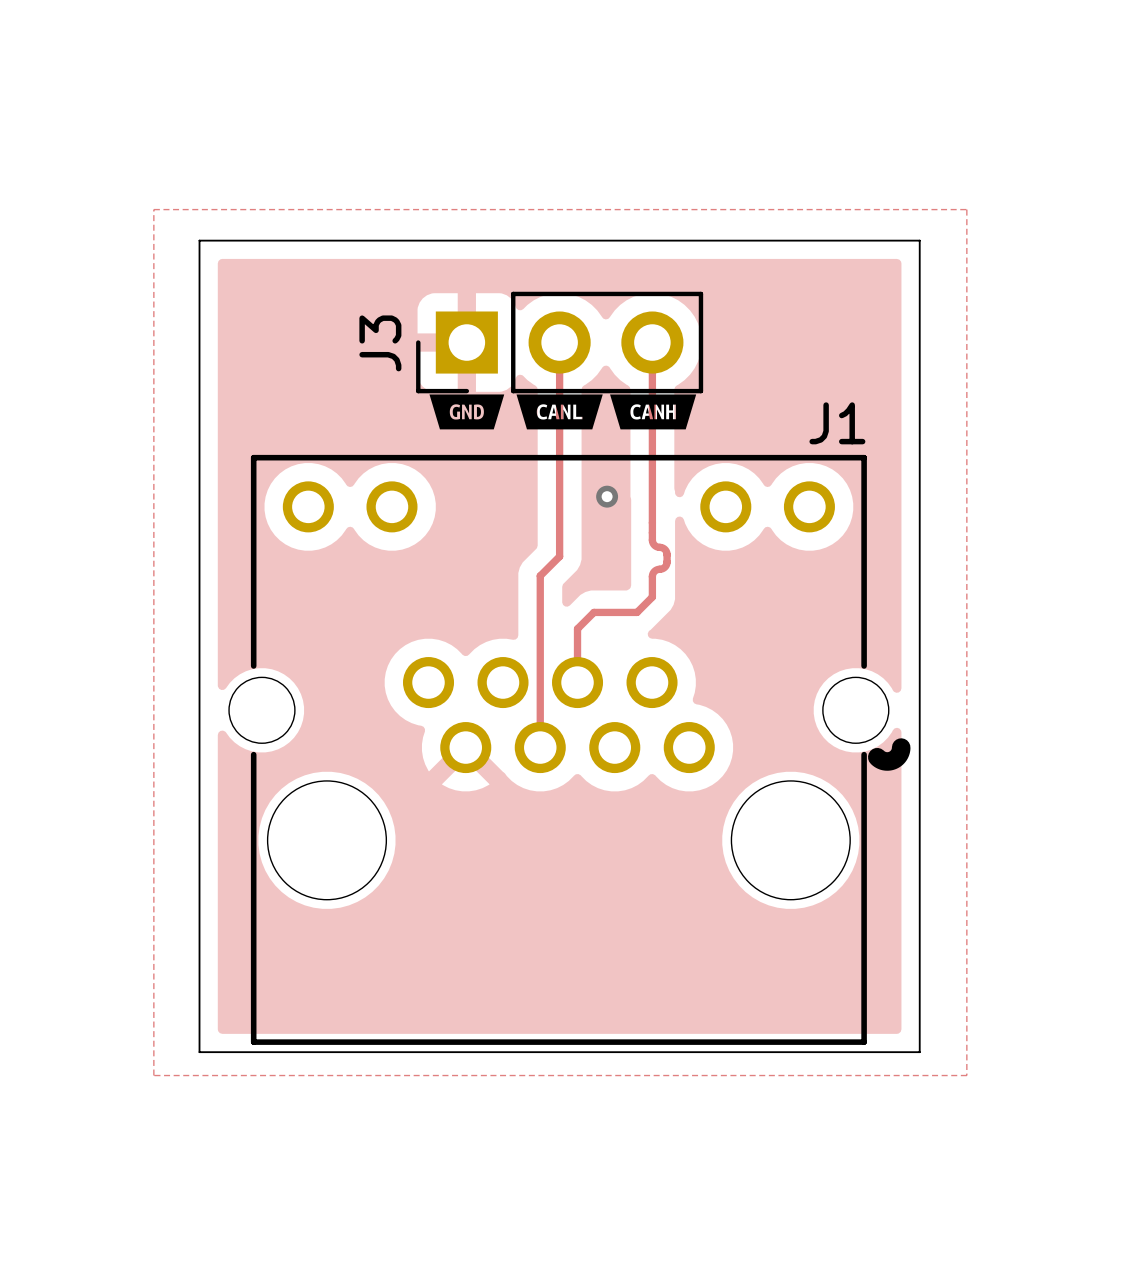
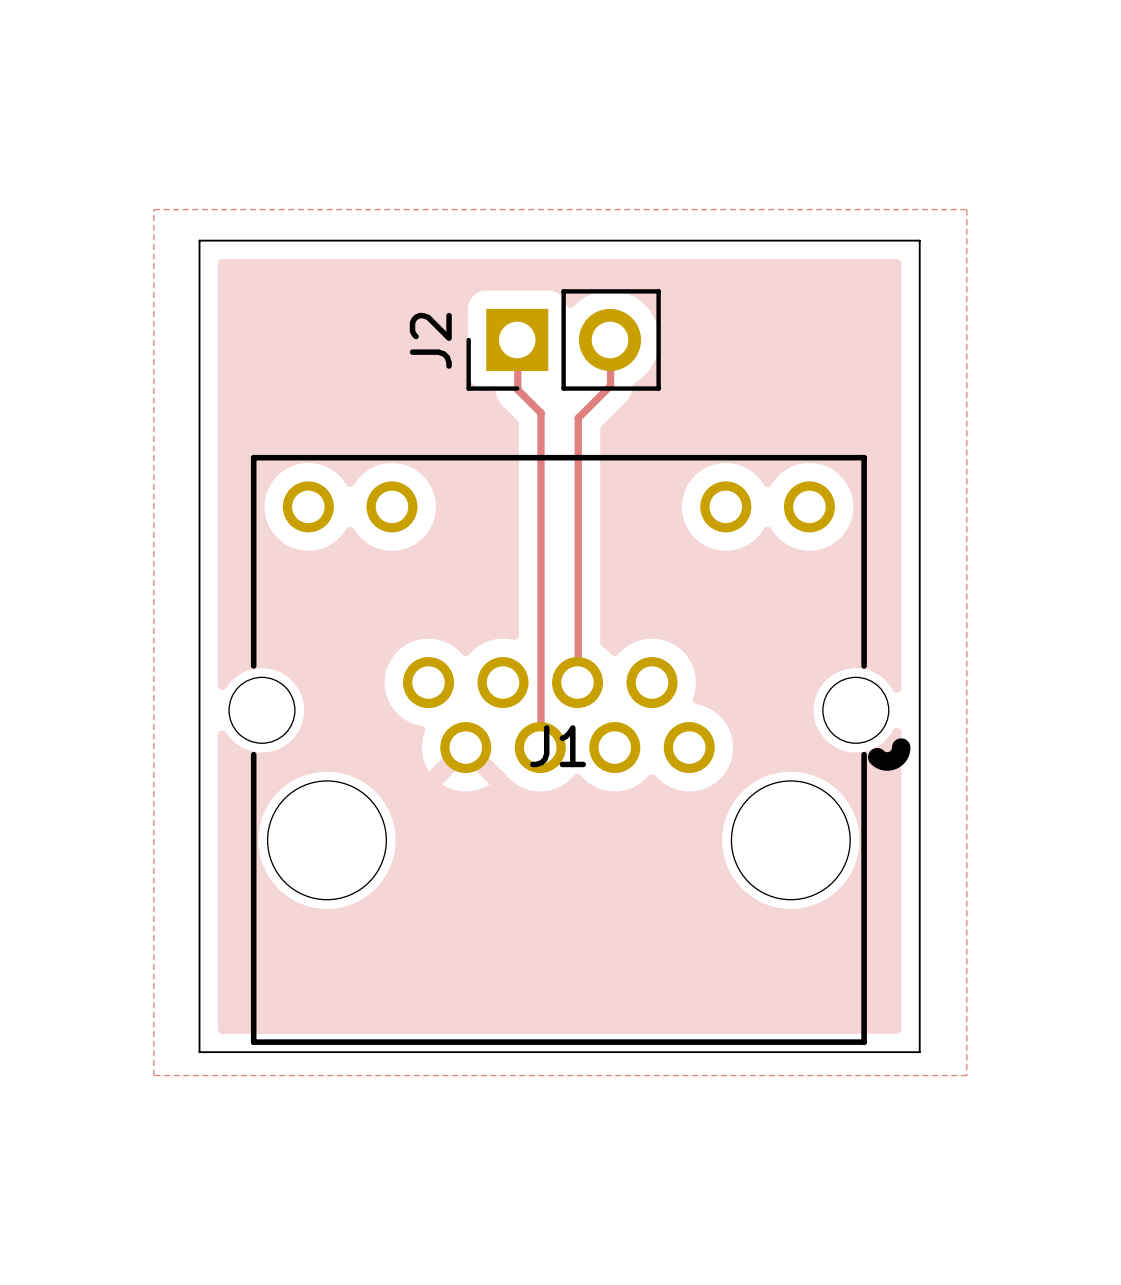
J2: none -> (563, 339)
track: (559, 342) (559, 556) (540, 575) (540, 747) -> (517, 339) (517, 389) (540, 413) (540, 747)
J3: (559, 342) -> none
track: (652, 342) (652, 540) (655, 545) (666, 551) (666, 563) (664, 567) (653, 572) (652, 597) (637, 612) (593, 612) (577, 628) (577, 682) -> (610, 339) (610, 385) (578, 418) (577, 682)
drawing: [429, 394, 697, 430] -> none
J1 name position: J1 (837, 423) -> J1 (558, 746)
via: (607, 496) -> none

